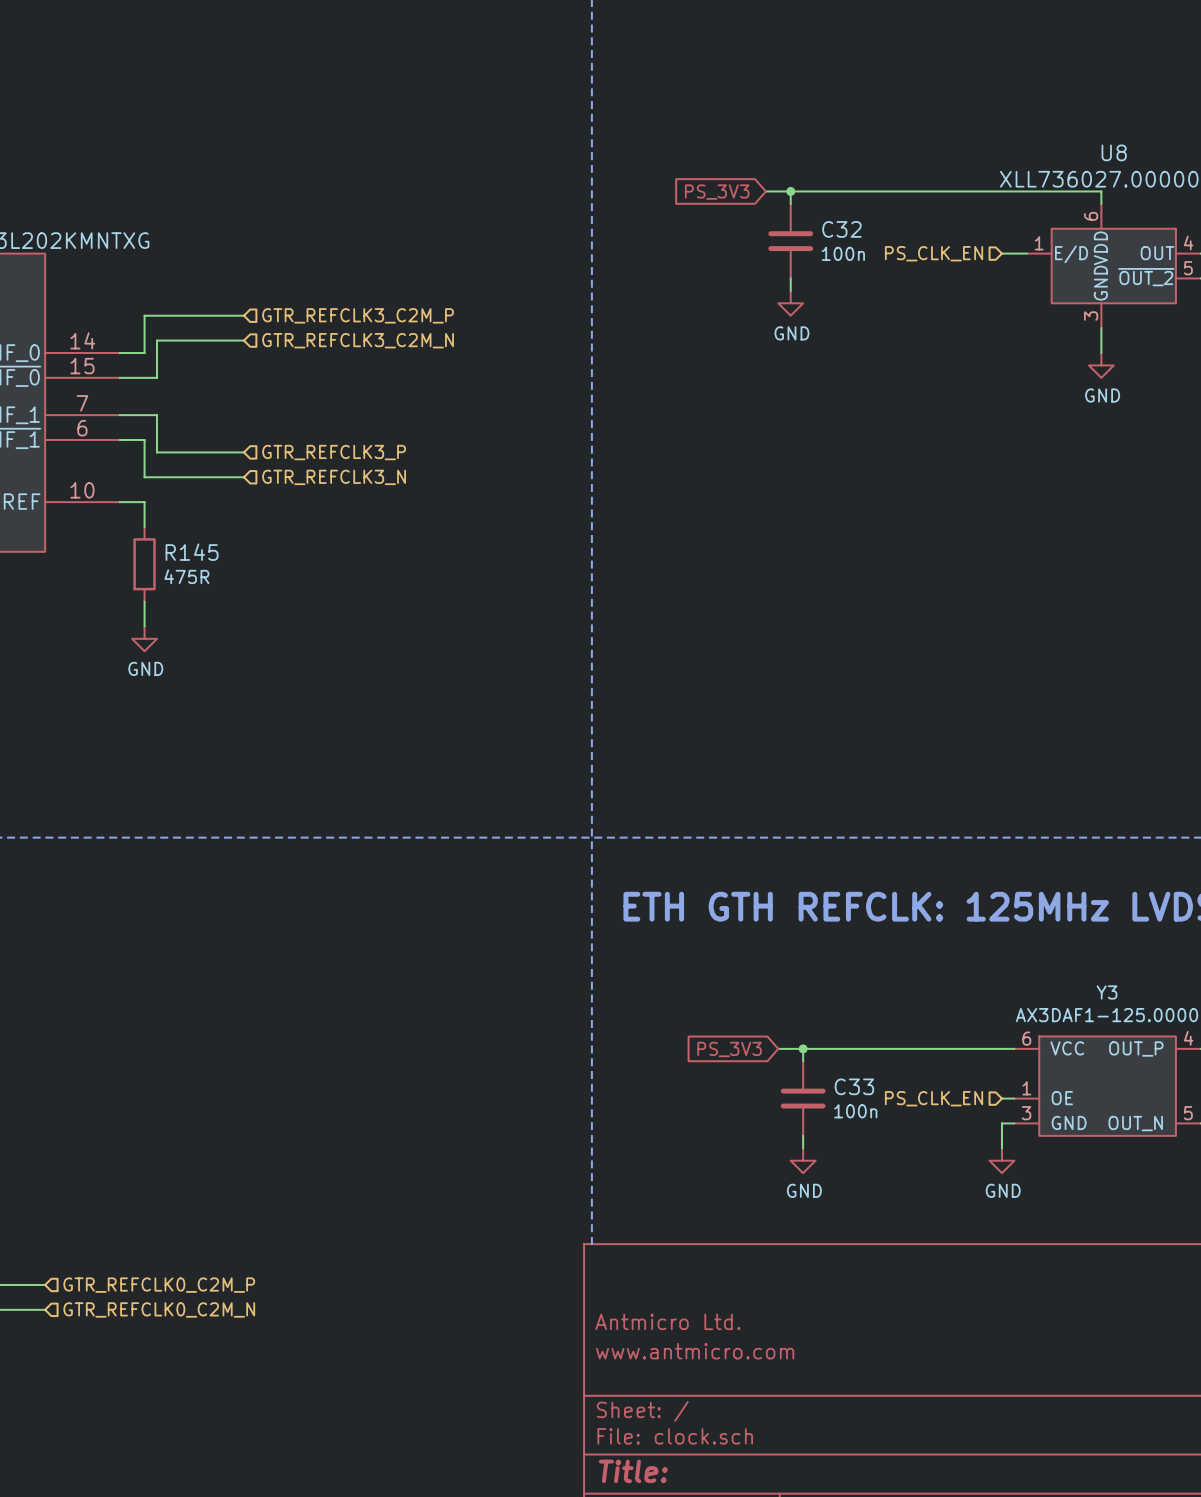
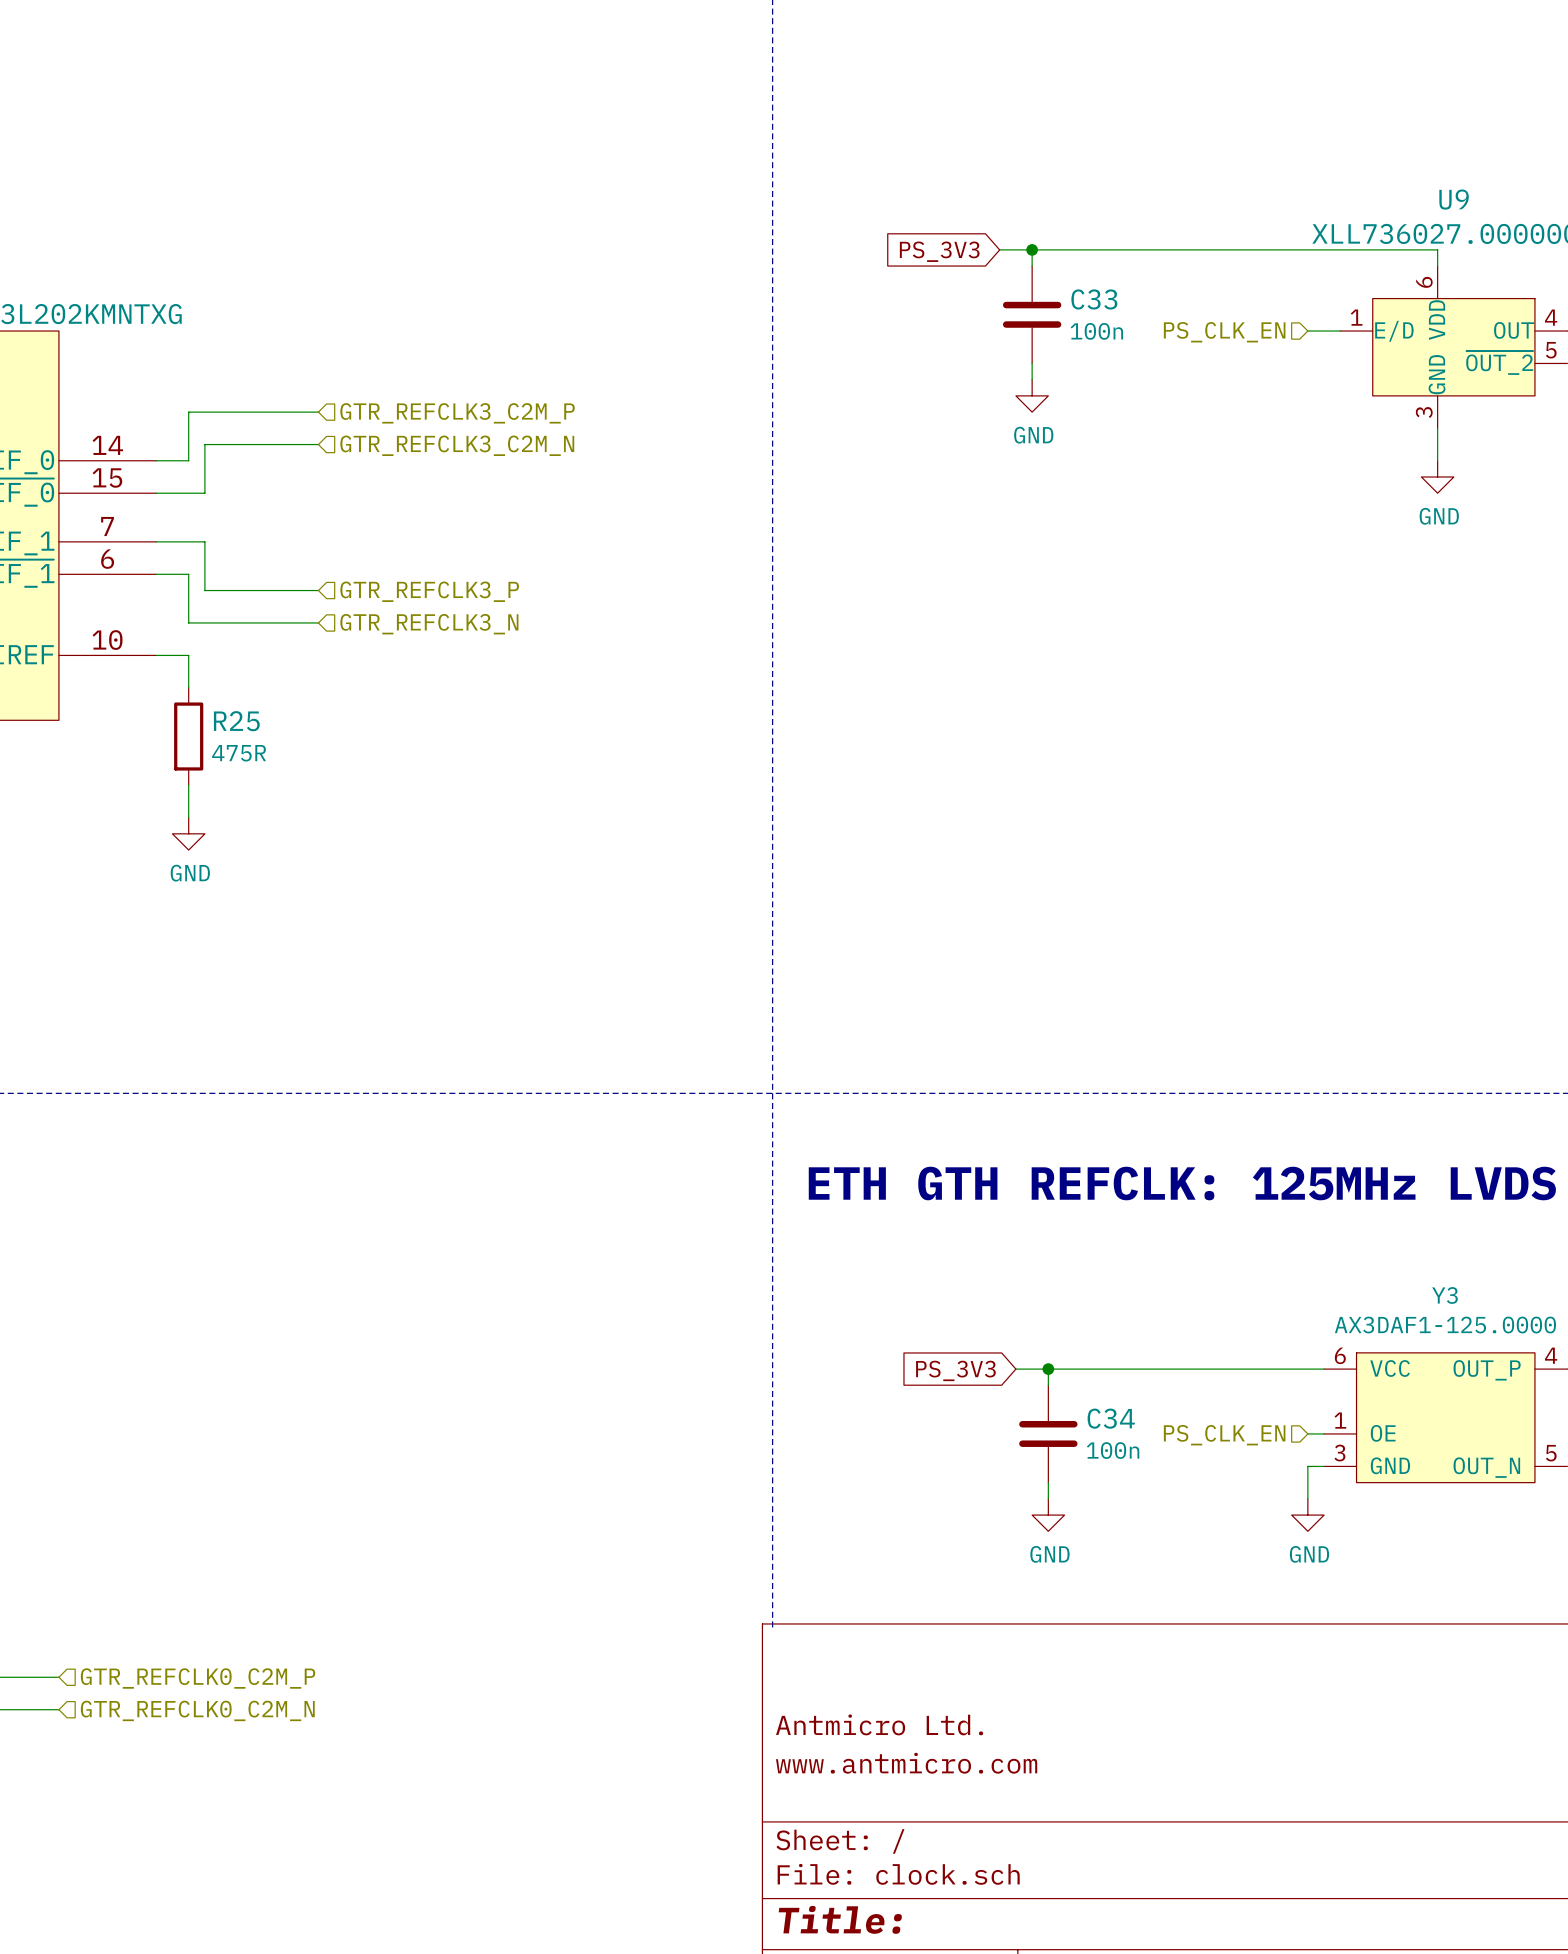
U8 name: U8 (1114, 152) -> U9 (1454, 199)
C32 name: C32 (841, 229) -> C33 (1094, 299)
R145 name: R145 (192, 552) -> R25 (236, 721)
C33 name: C33 (854, 1086) -> C34 (1111, 1418)

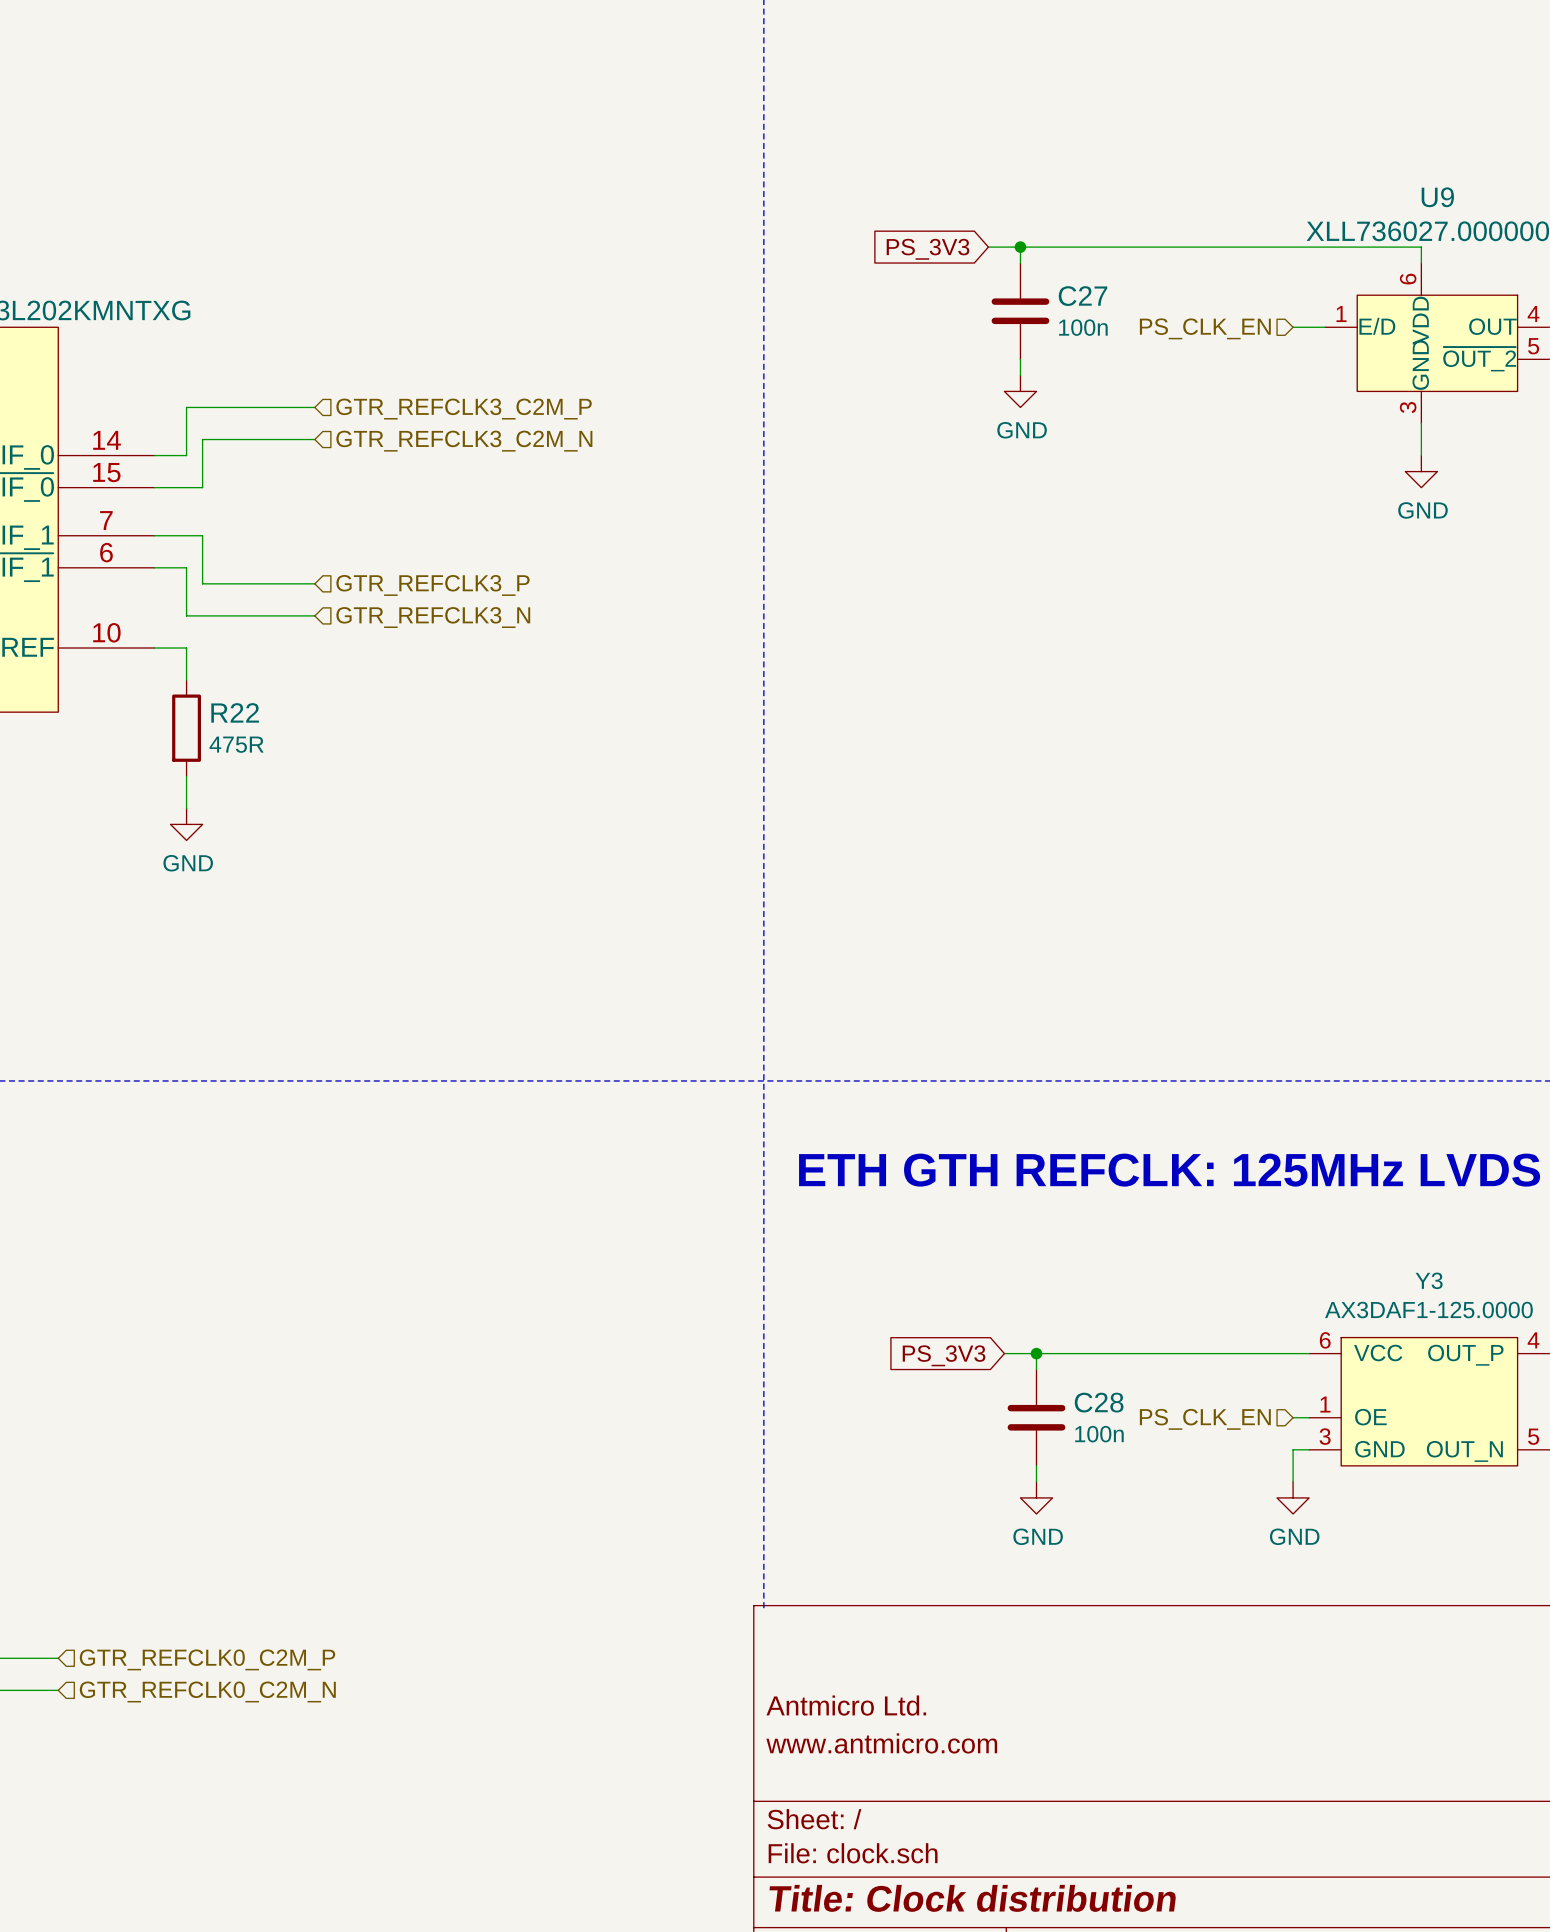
C33 name: C33 (1094, 299) -> C27 (1083, 296)
R25 name: R25 (236, 721) -> R22 (235, 712)
C34 name: C34 (1111, 1418) -> C28 (1099, 1402)
title block: Title: (840, 1919) -> Title: Clock distribution (972, 1898)

